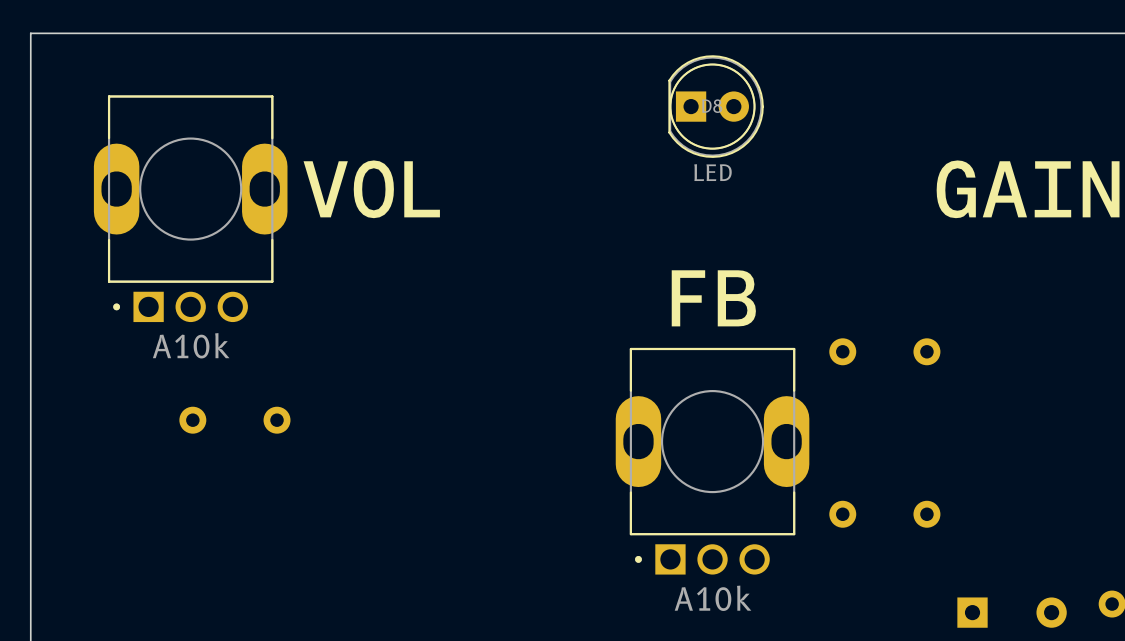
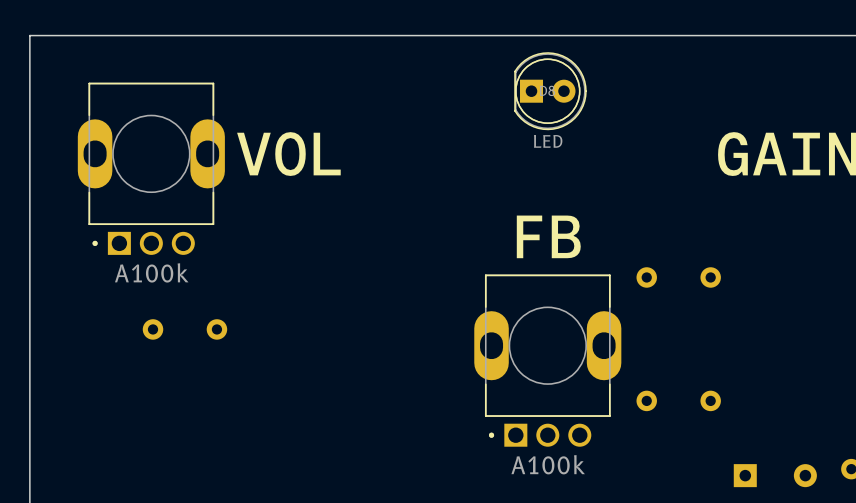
part value: A10k (191, 345) -> A100k (151, 272)
part value: A10k (713, 598) -> A100k (548, 464)

